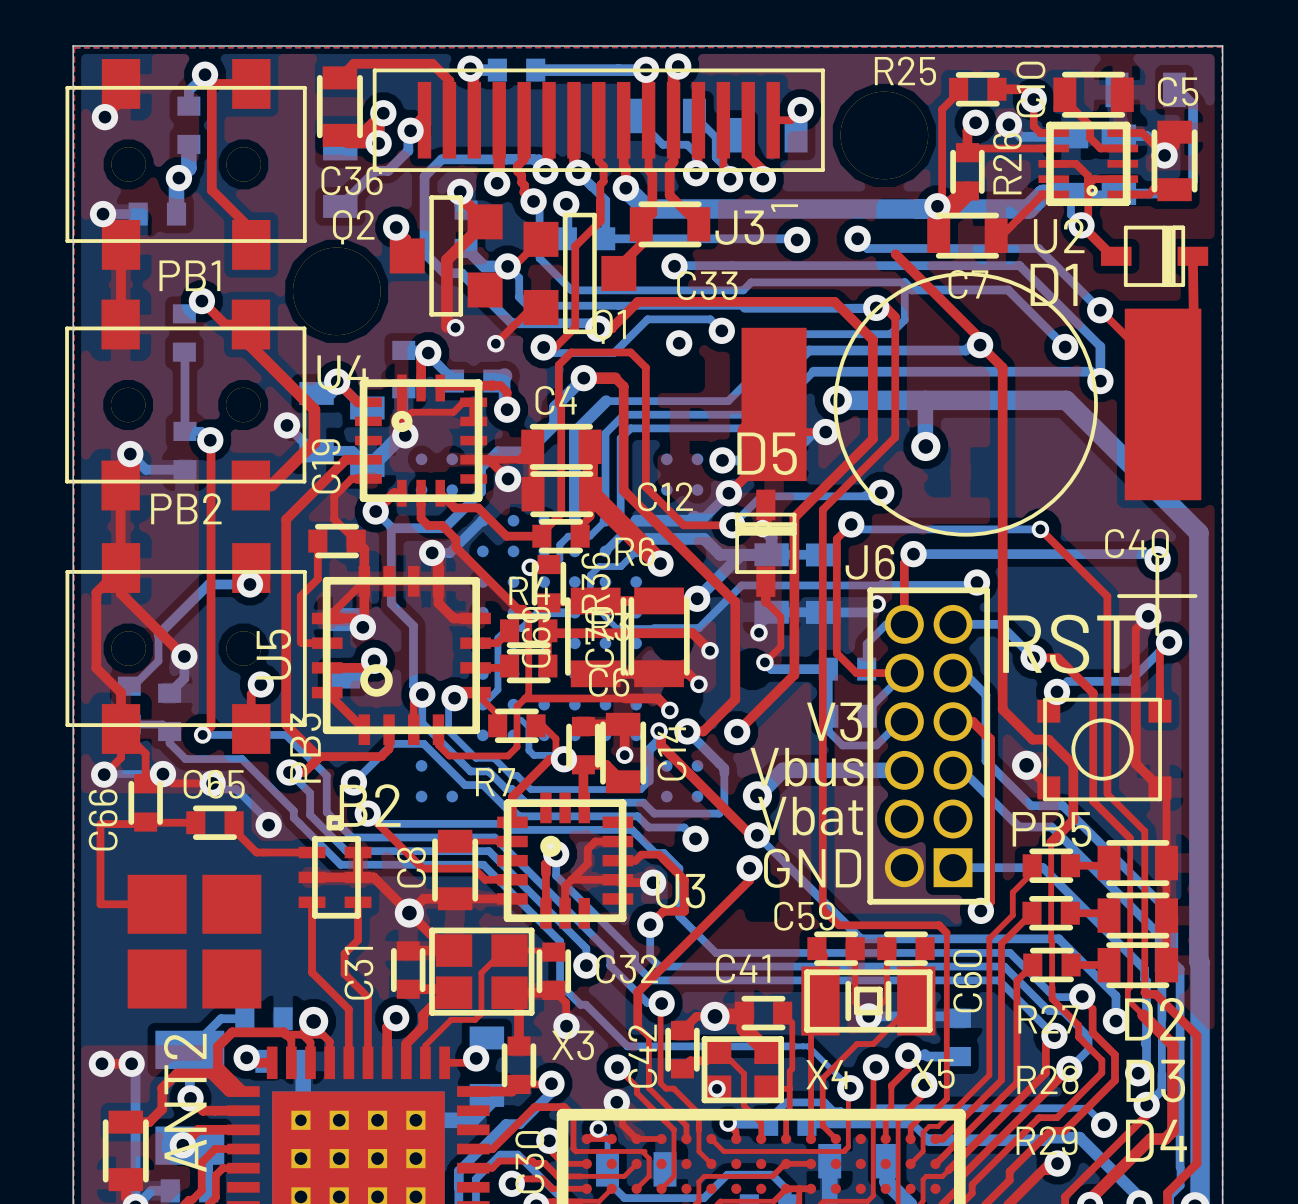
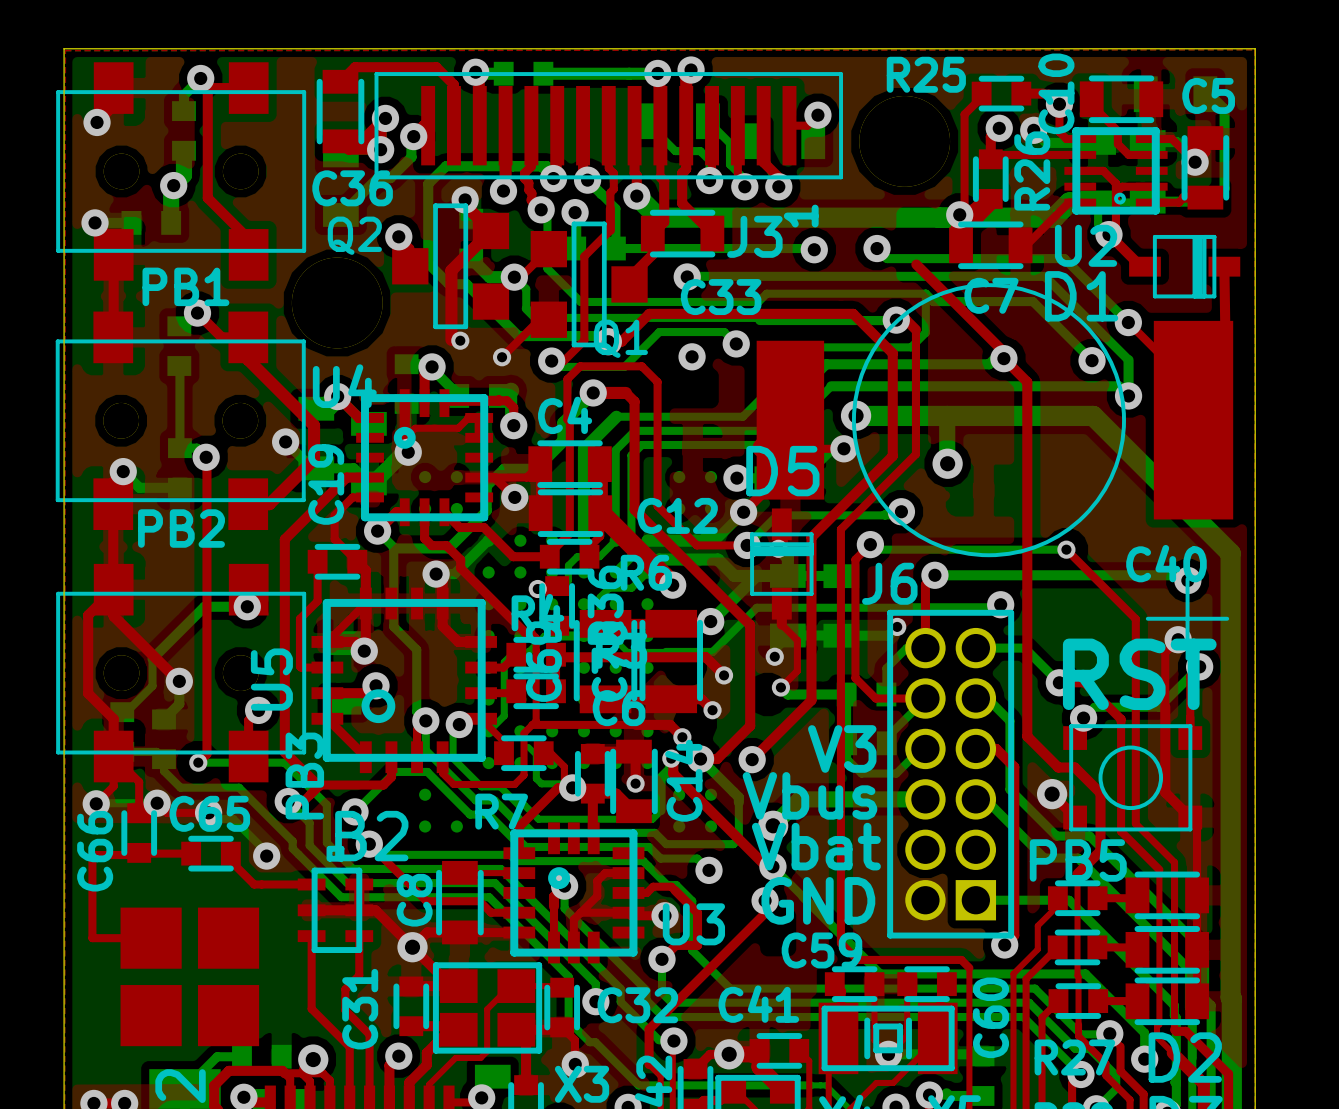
text position: RST (1069, 644) -> RST (1139, 674)

